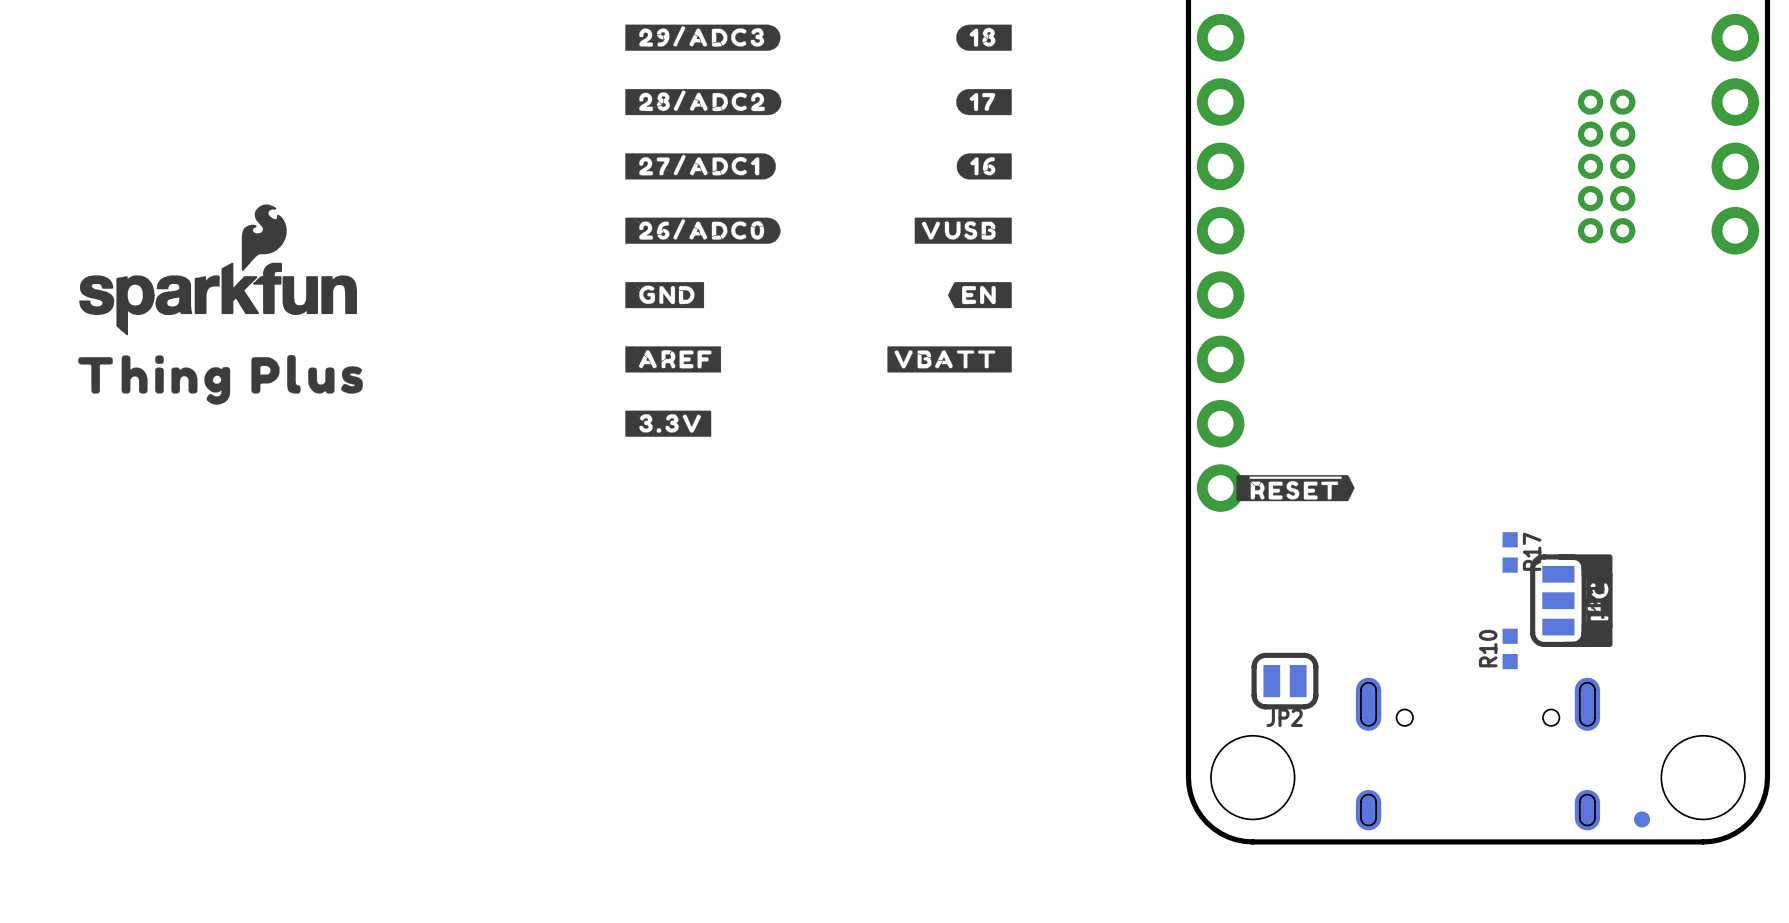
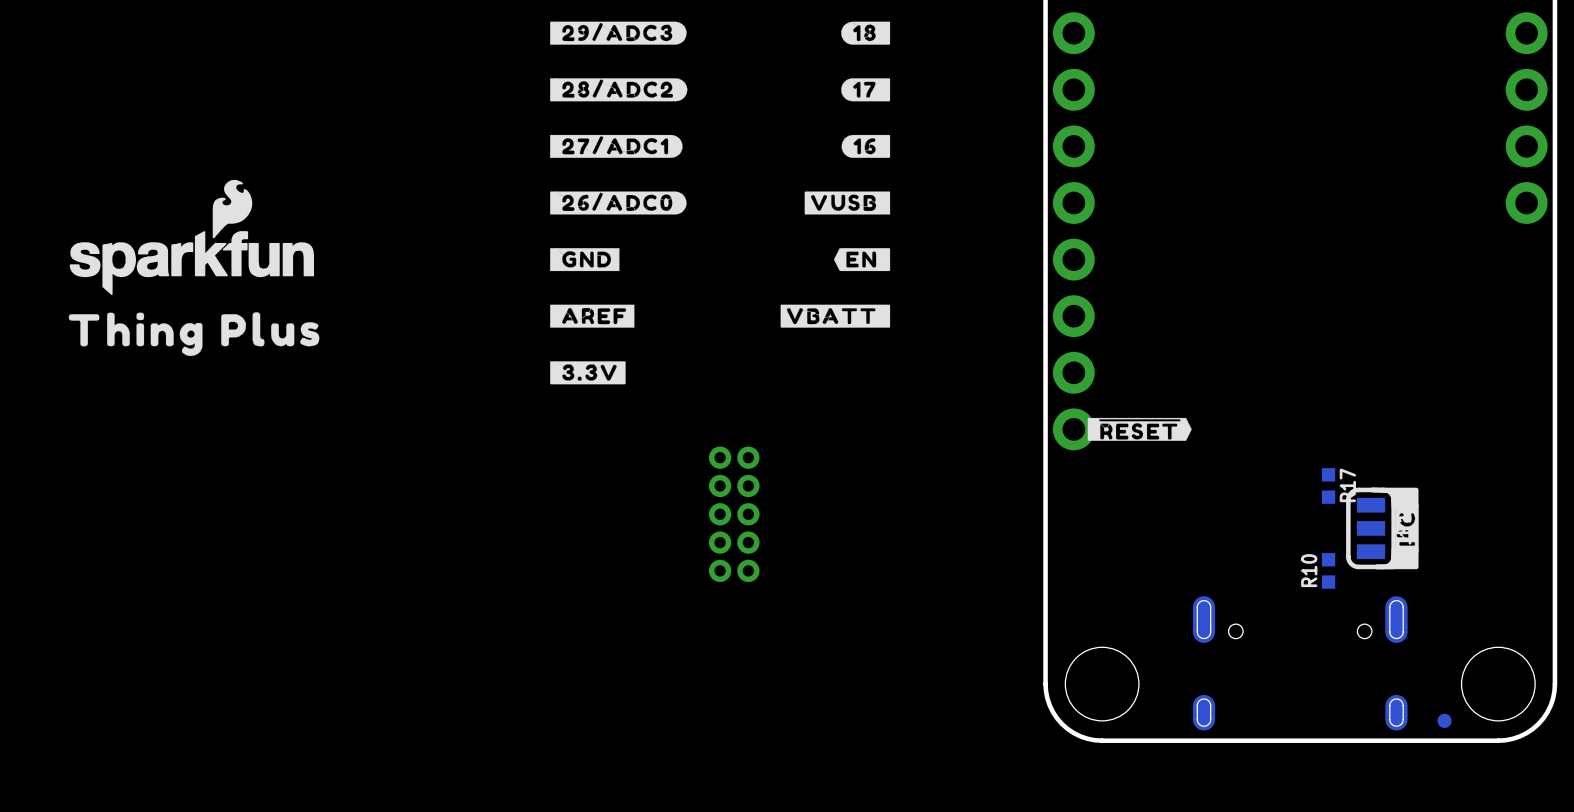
part: (1606, 166) -> none
part: none -> (734, 514)
JP2: (1284, 681) -> none

